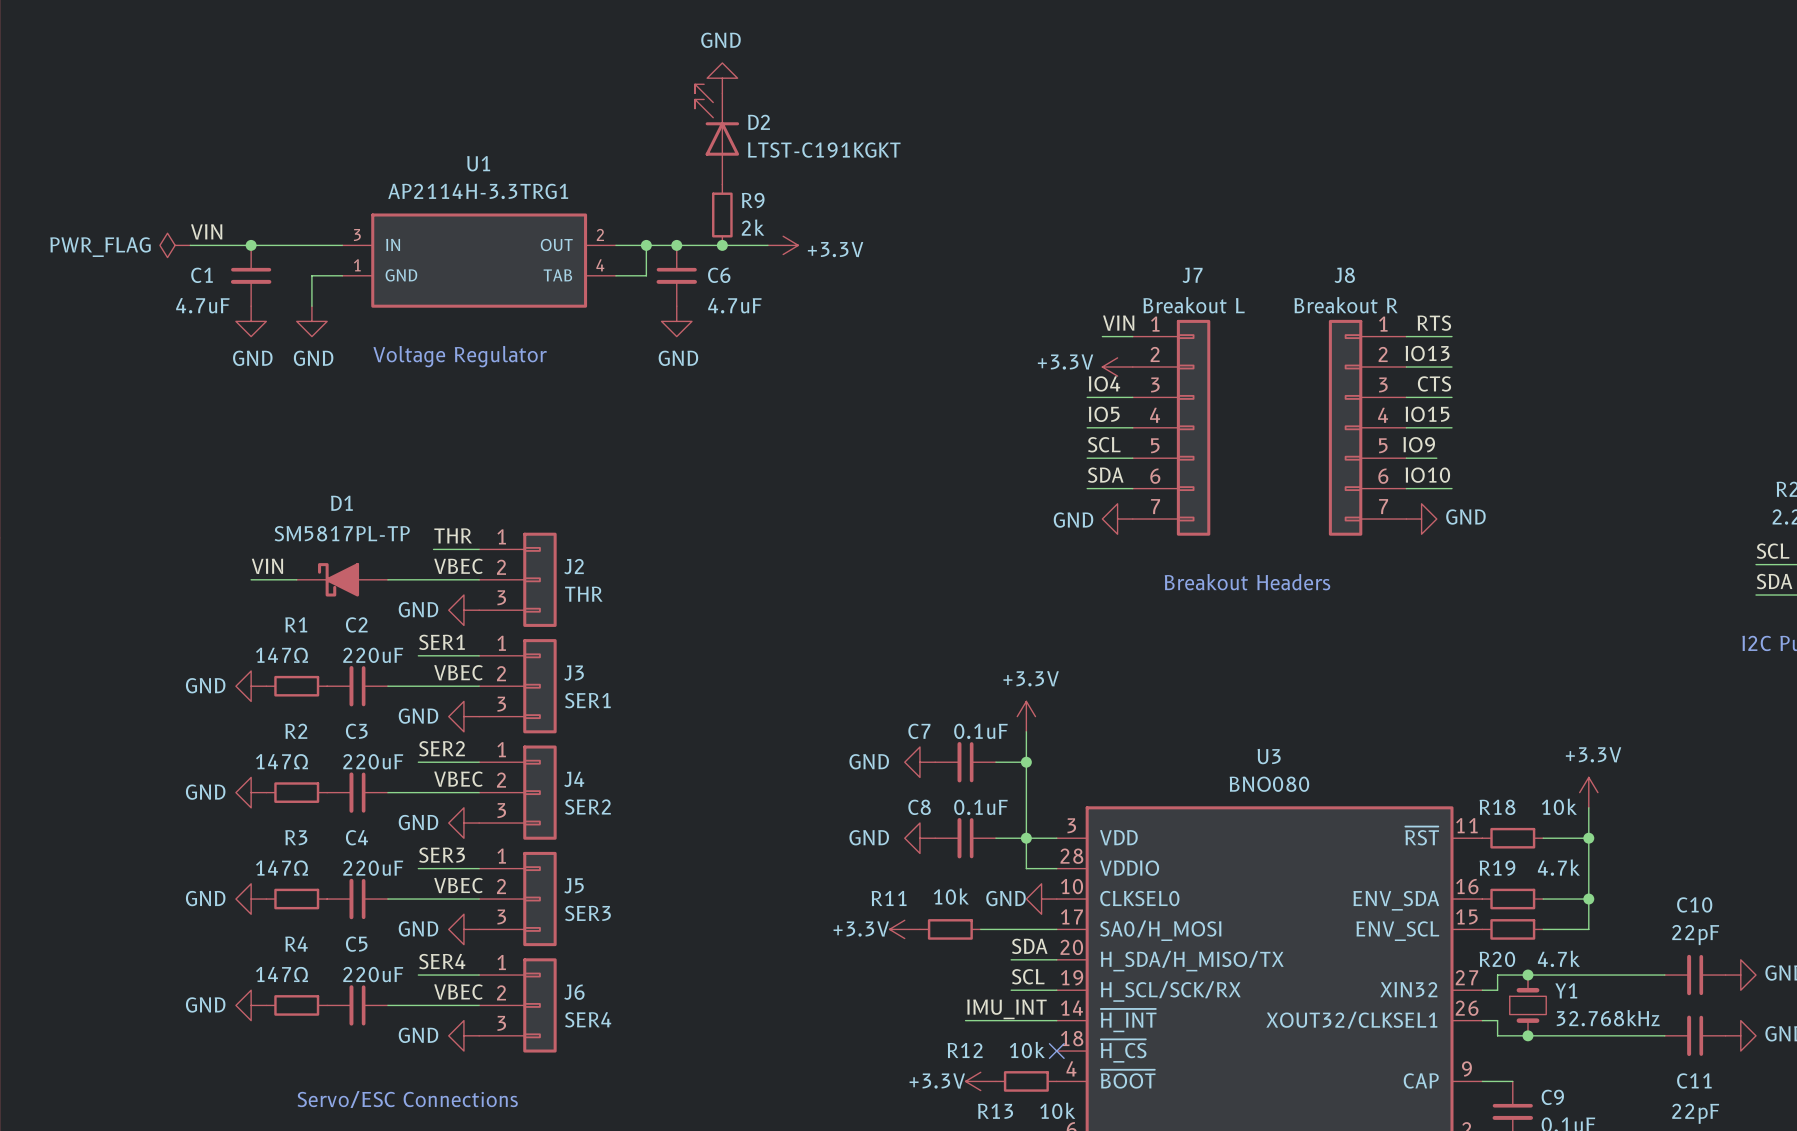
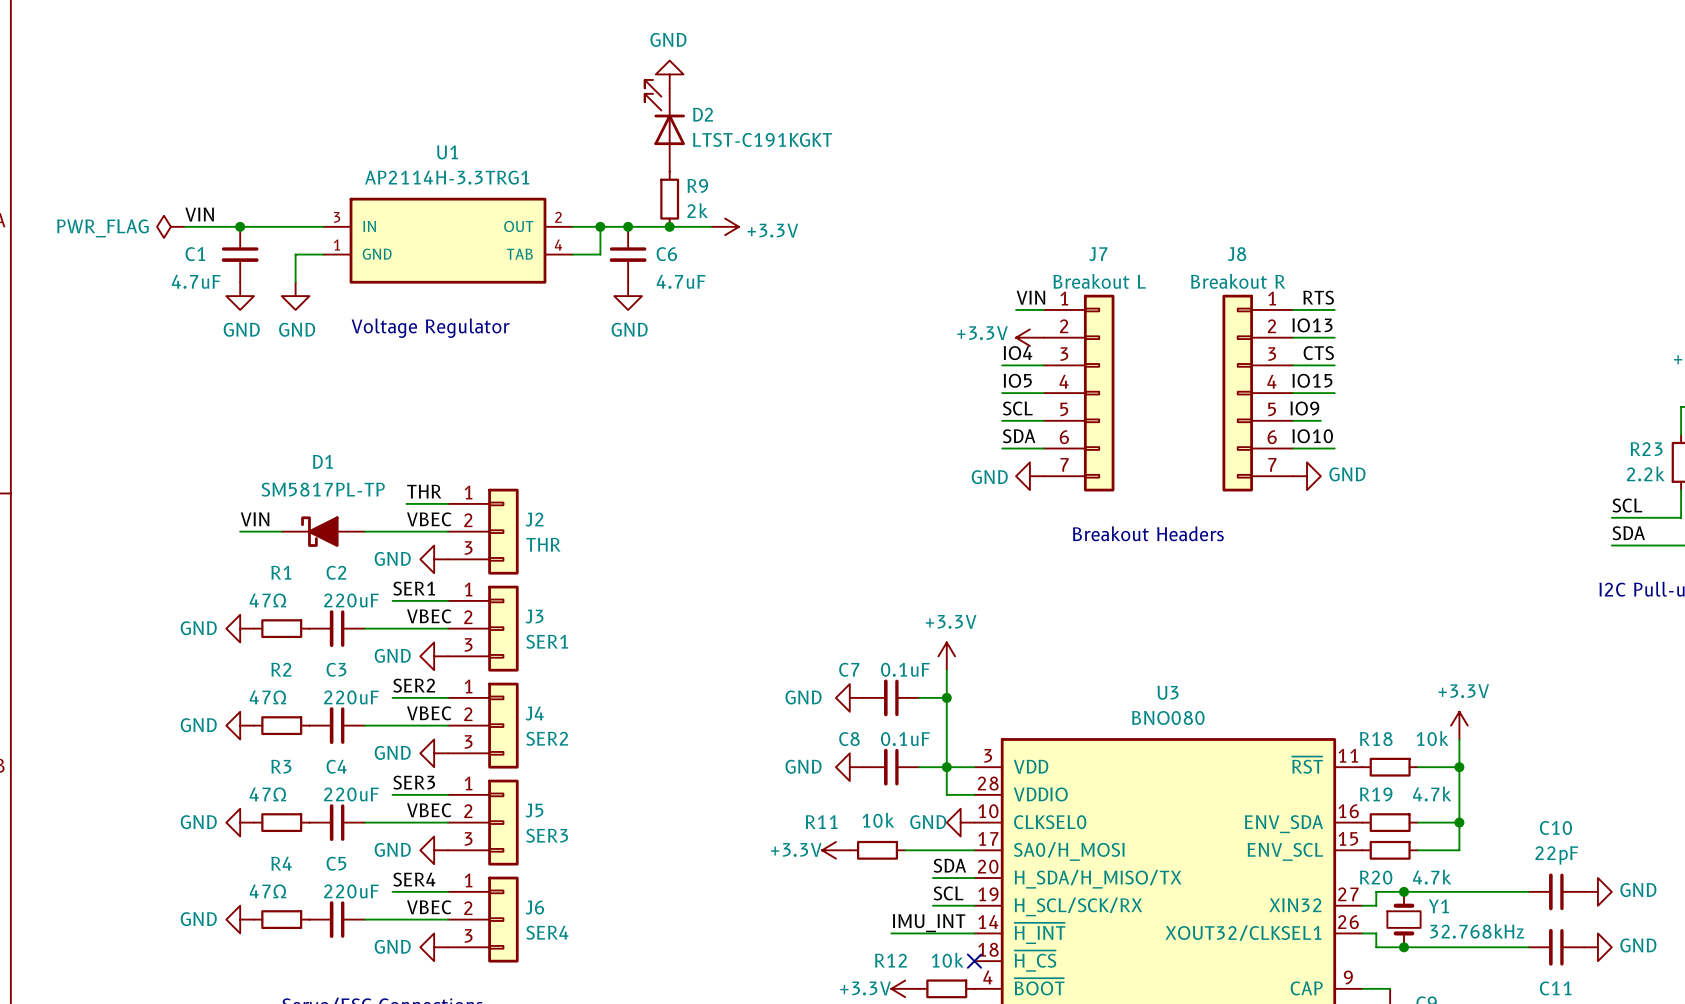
R1 value: 147Ω (282, 655) -> 47Ω (267, 600)
R2 value: 147Ω (282, 761) -> 47Ω (267, 697)
R3 value: 147Ω (282, 868) -> 47Ω (267, 794)
R4 value: 147Ω (282, 974) -> 47Ω (267, 891)

